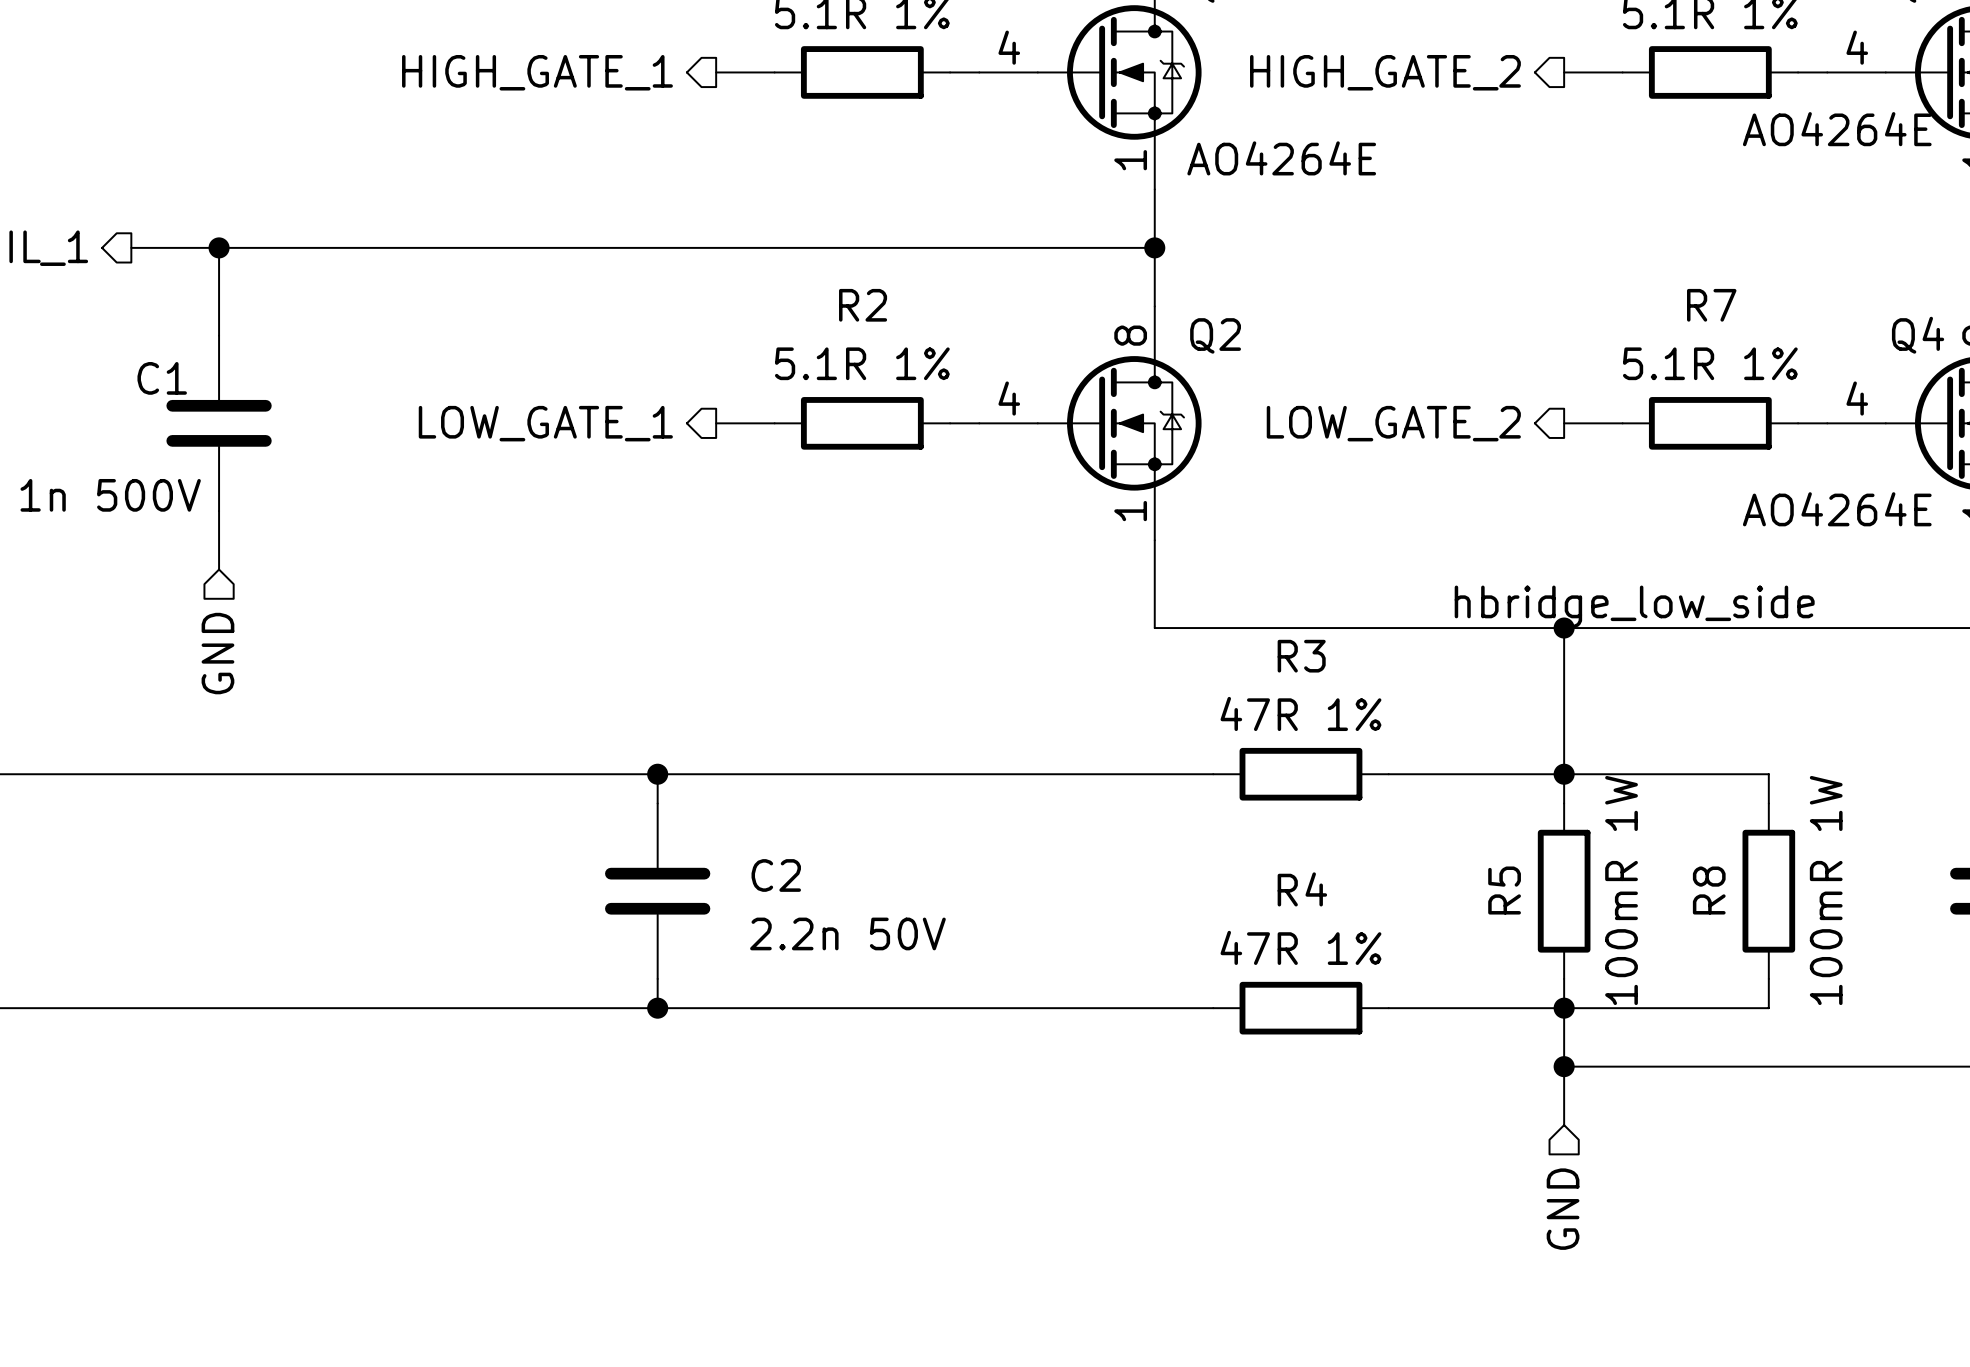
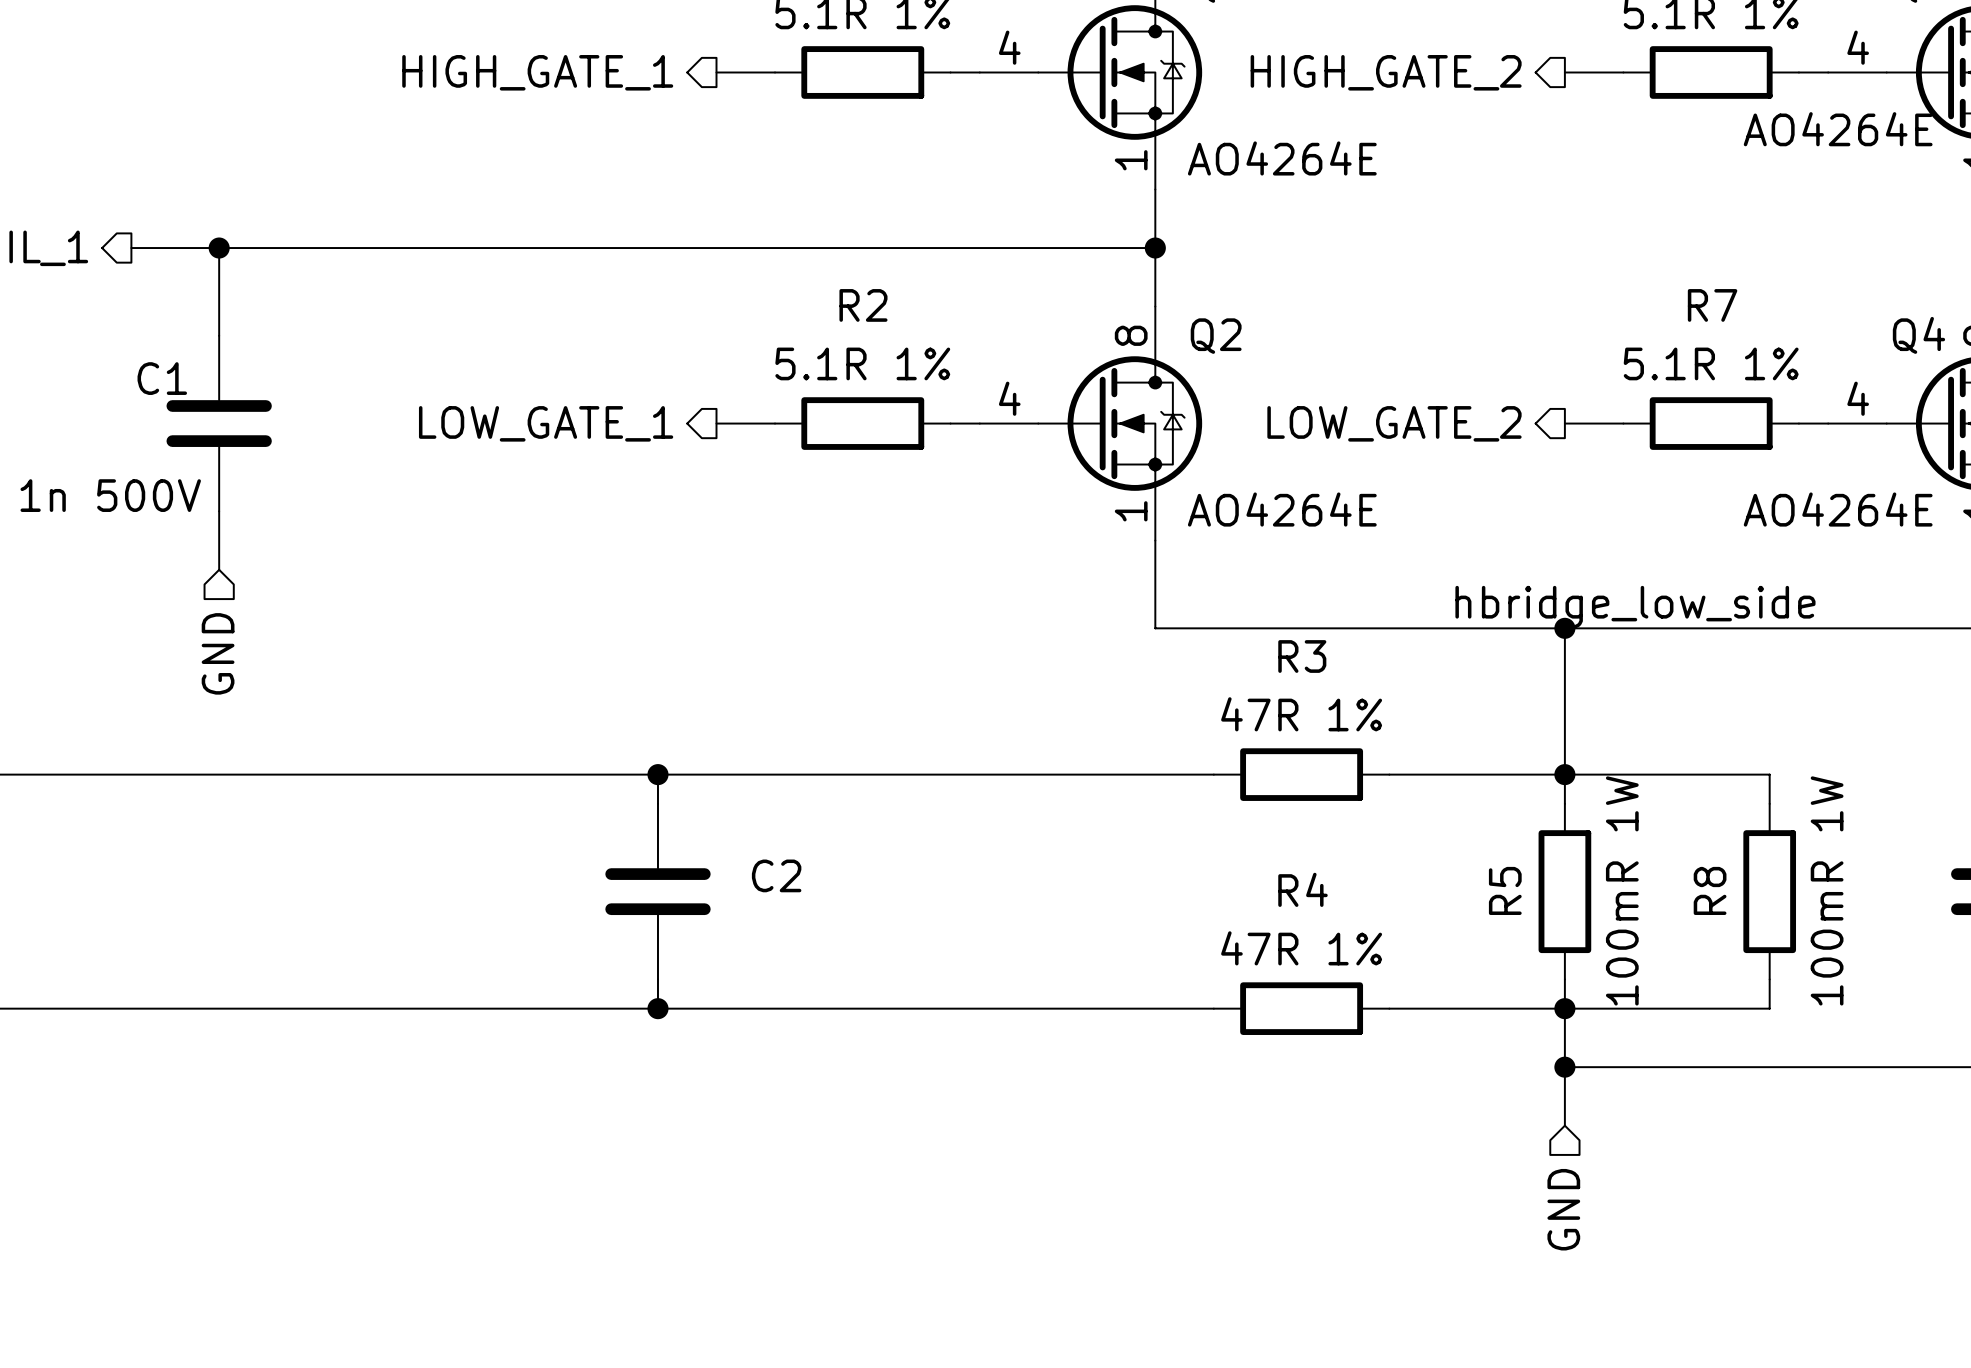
Q2 value: none -> AO4264E (1282, 509)
C2 value: 2.2n 50V (847, 933) -> none

